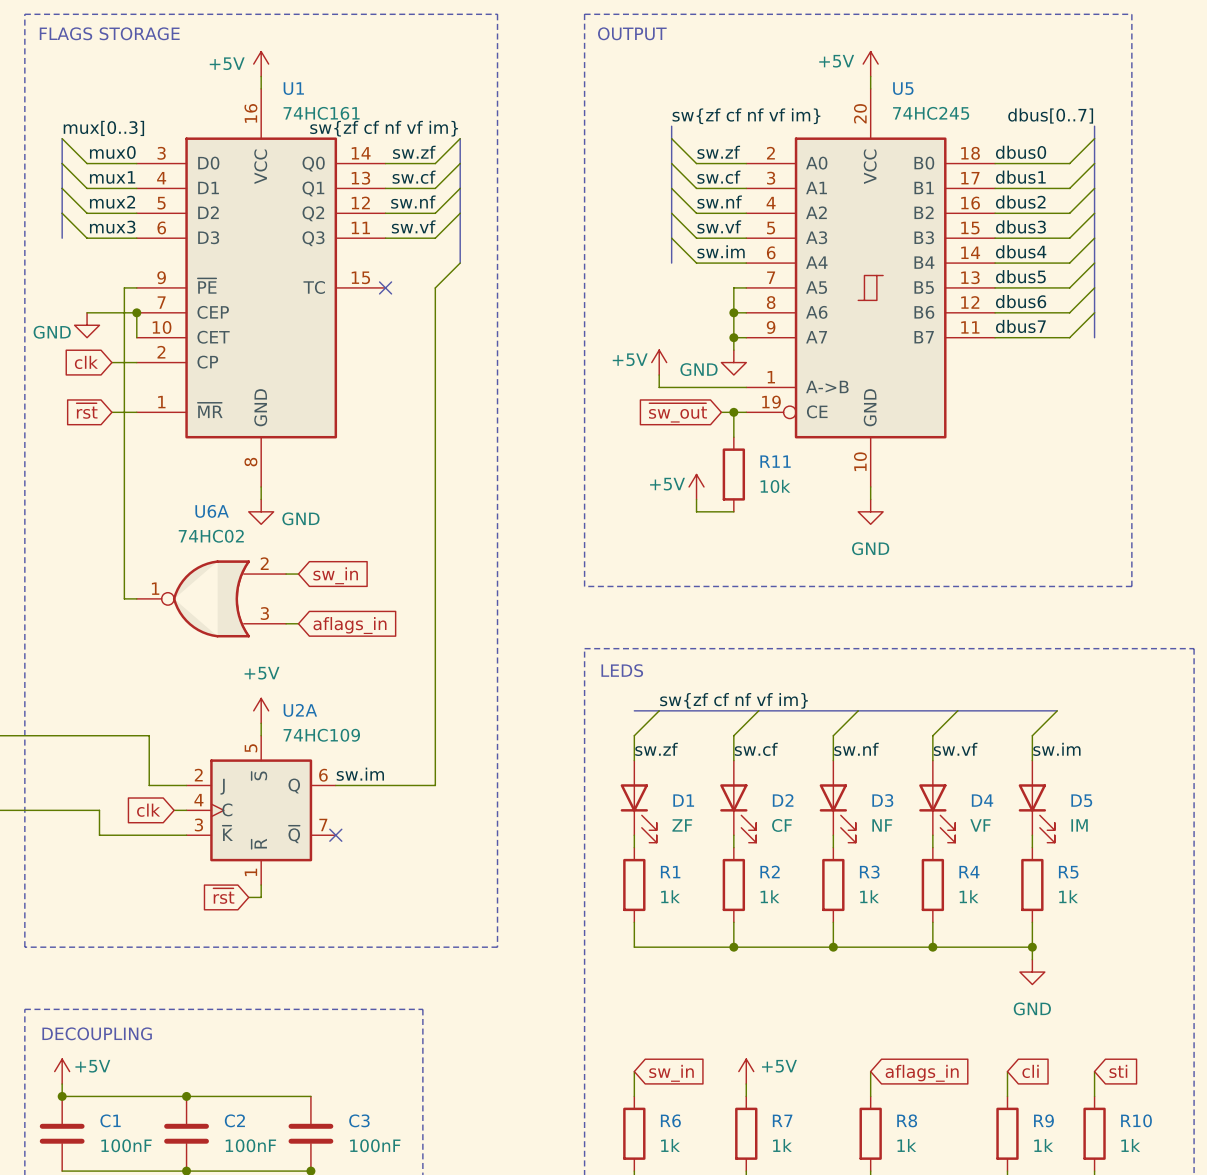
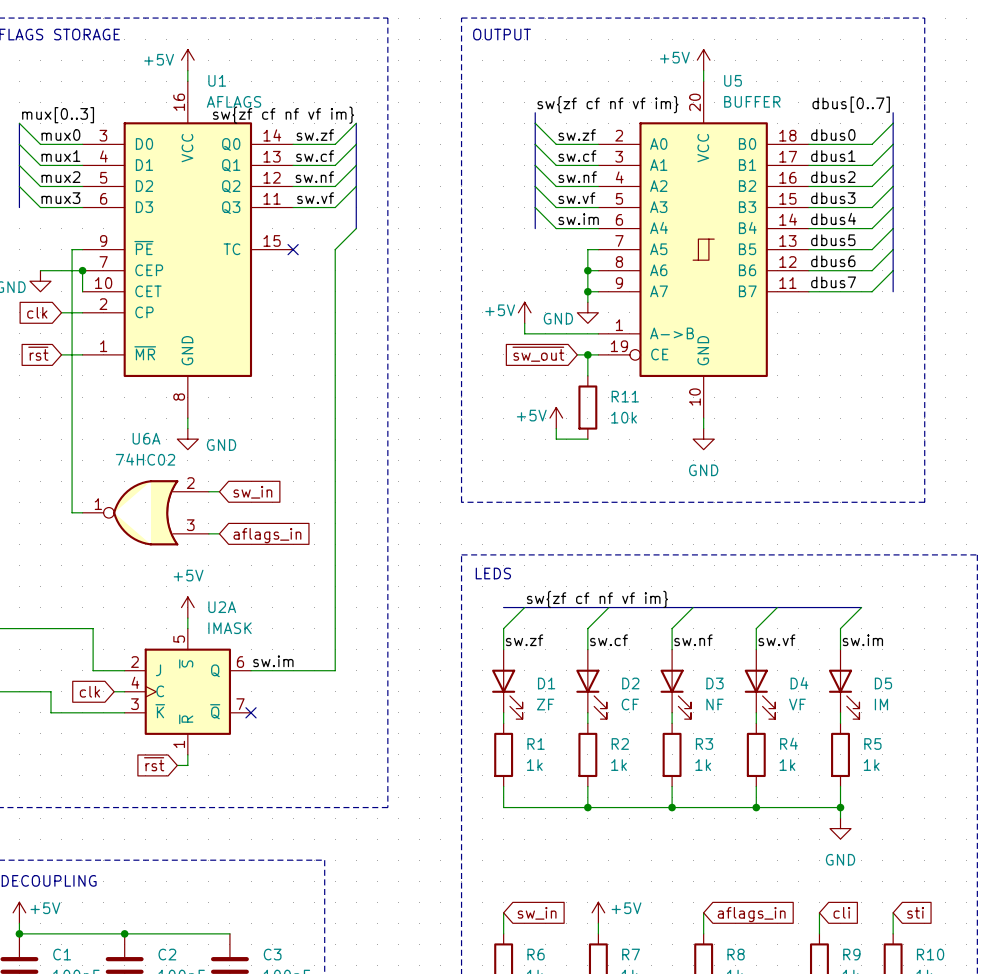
U1 value: 74HC161 (321, 113) -> AFLAGS (234, 101)
U5 value: 74HC245 (931, 113) -> BUFFER (752, 101)
U2A value: 74HC109 (321, 735) -> IMASK (230, 628)

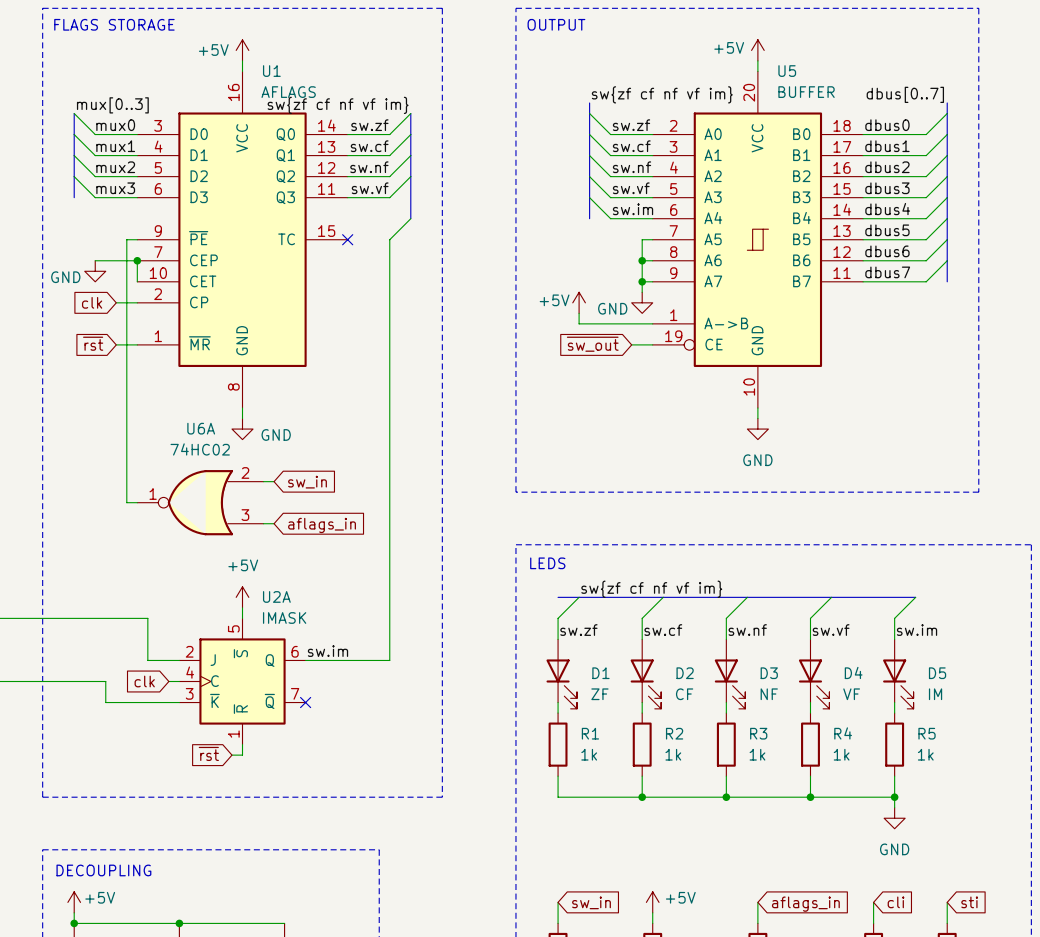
wire: (587, 354) (587, 375) -> none
junction: (587, 354) -> none
R11: 10k (587, 407) -> none
power symbol: +5V (556, 418) -> none
wire: (556, 428) (556, 439) (587, 439) -> none

